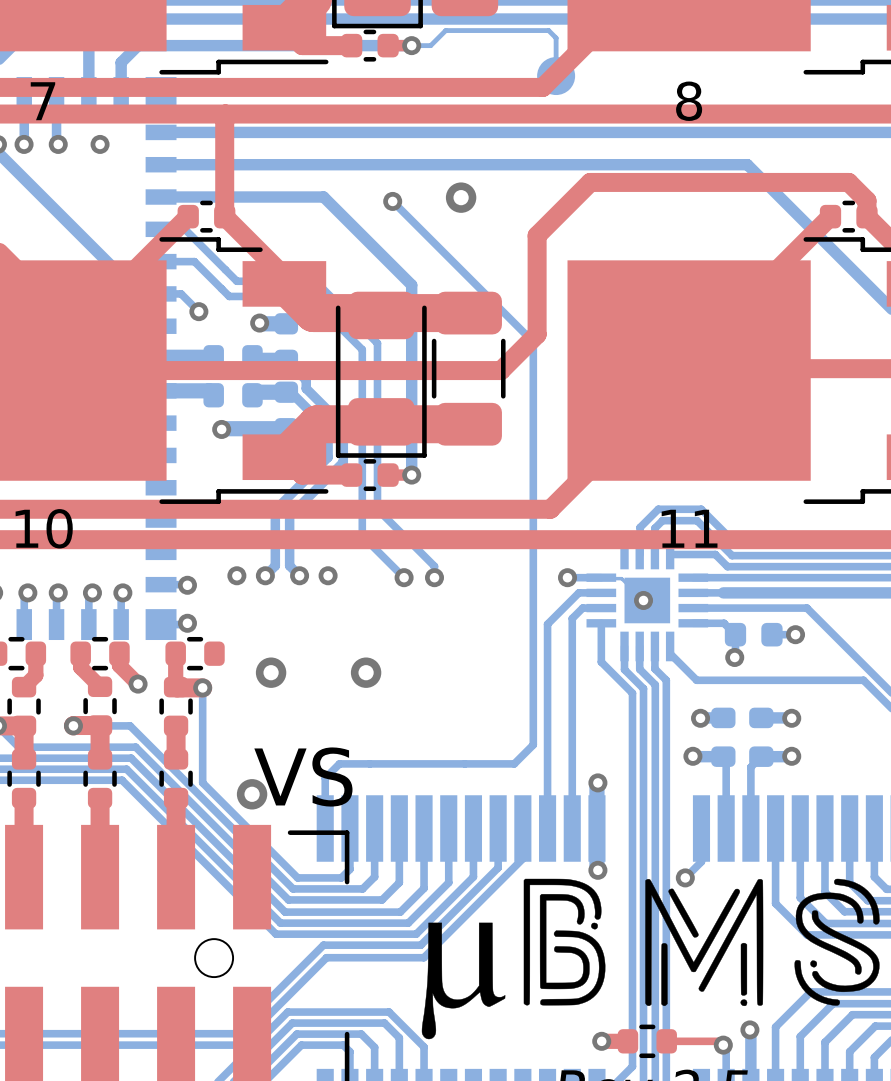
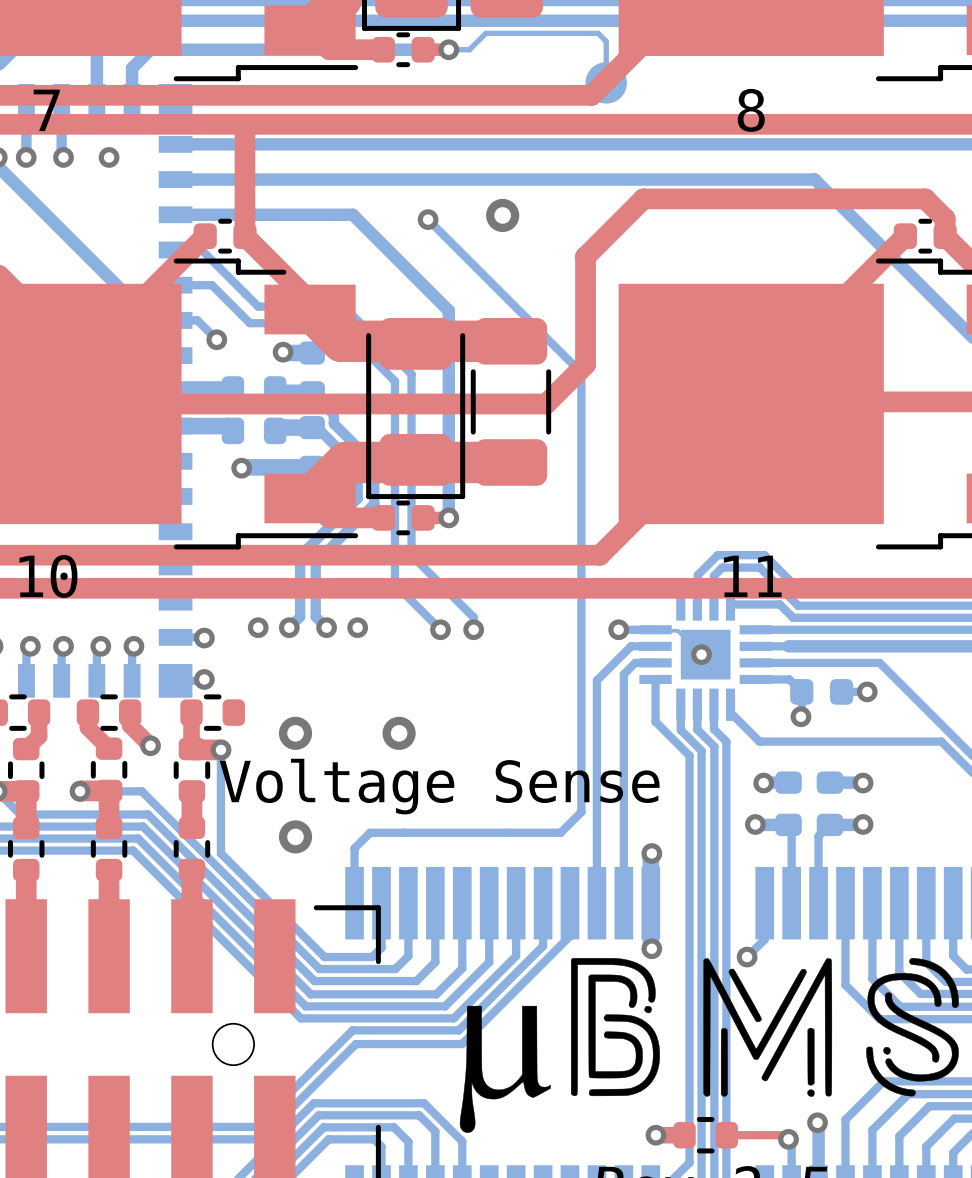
text: none -> Voltage Sense (439, 786)
text: VS (303, 777) -> none
via position: (252, 794) -> (295, 836)

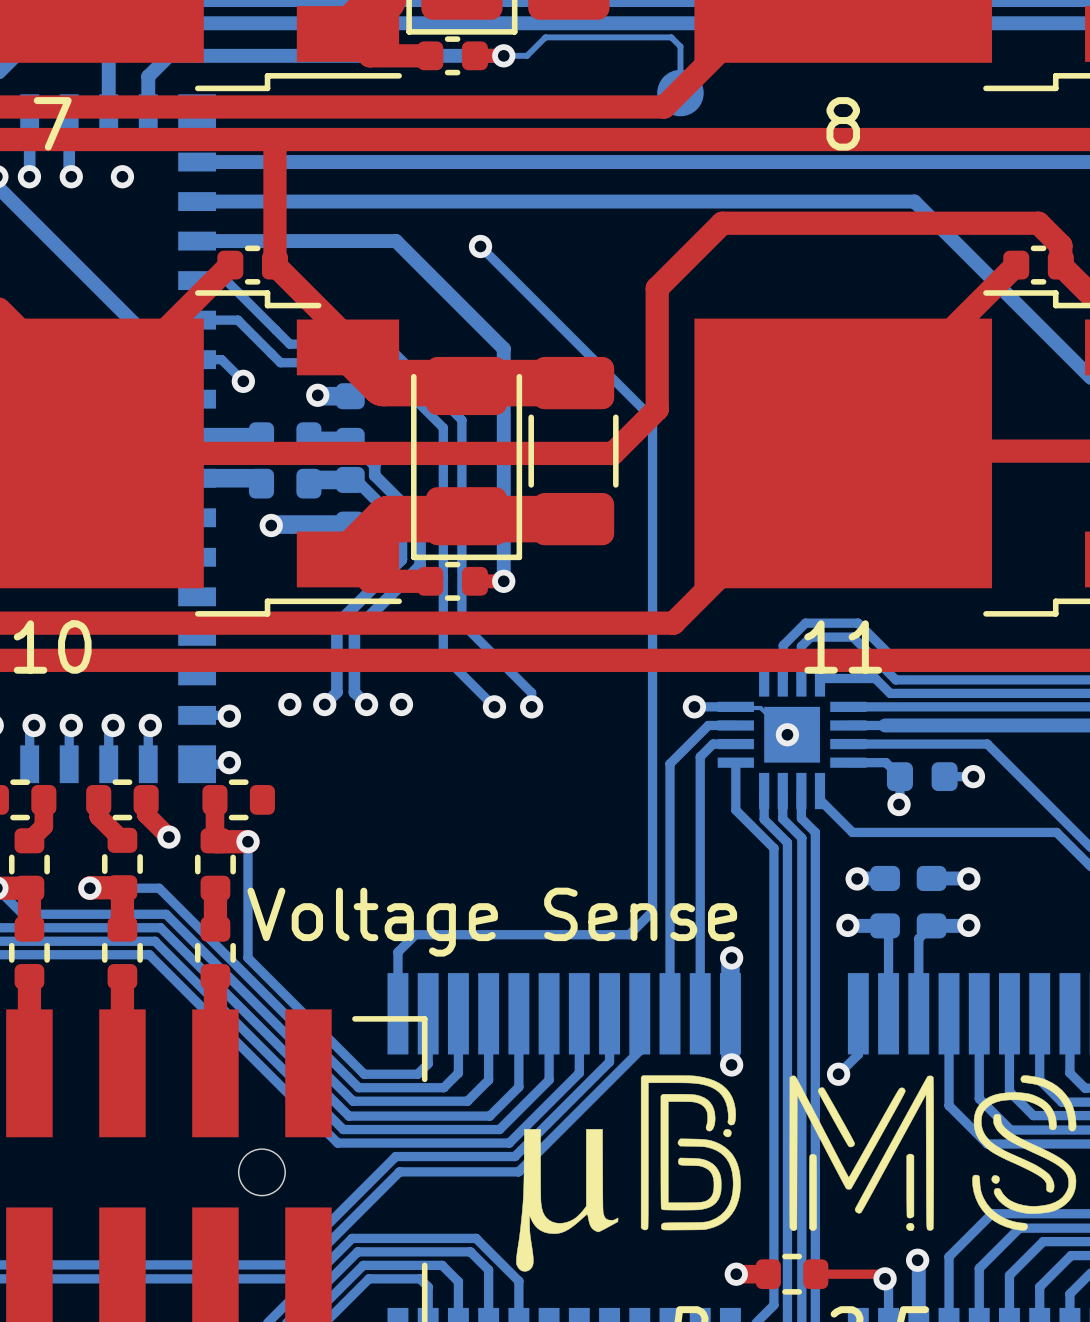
via: (502, 215) -> none
via: (295, 733) -> none
via: (399, 733) -> none
text position: Voltage Sense (439, 786) -> Voltage Sense (492, 922)
via: (295, 836) -> none

